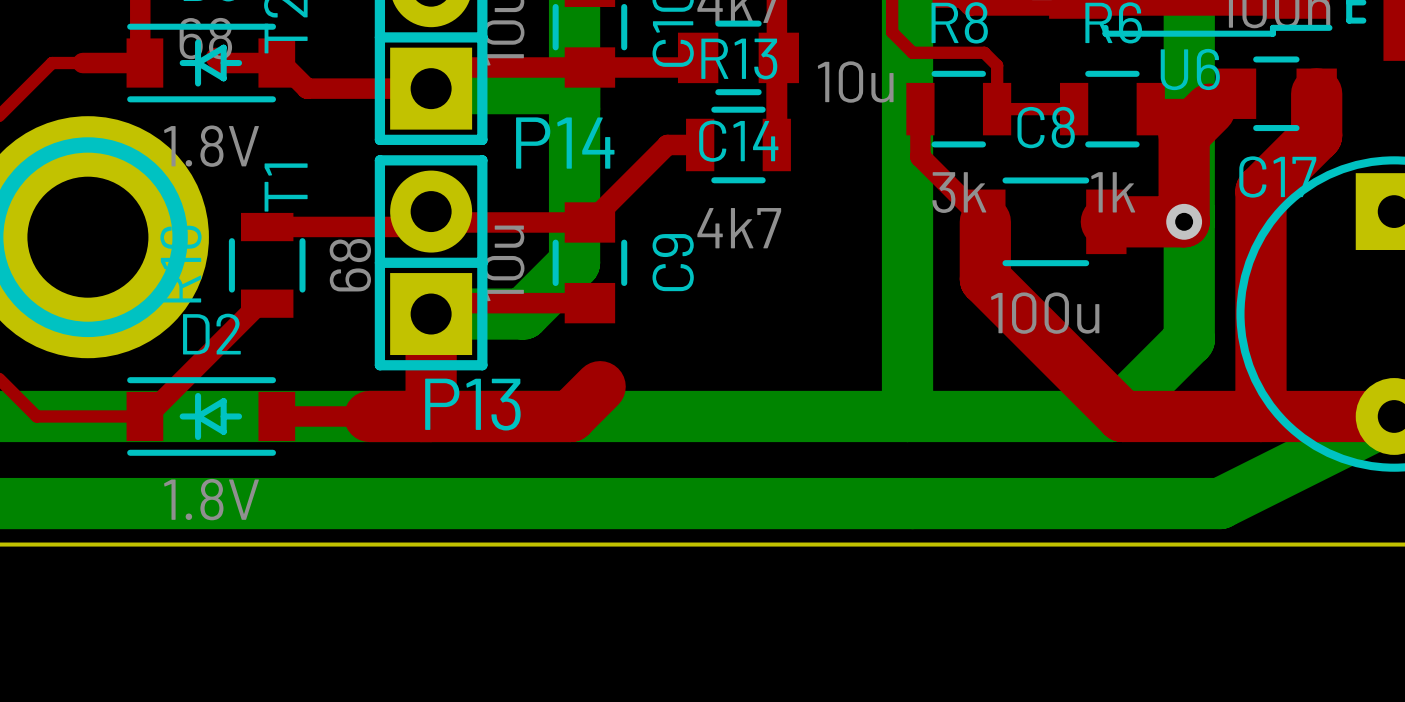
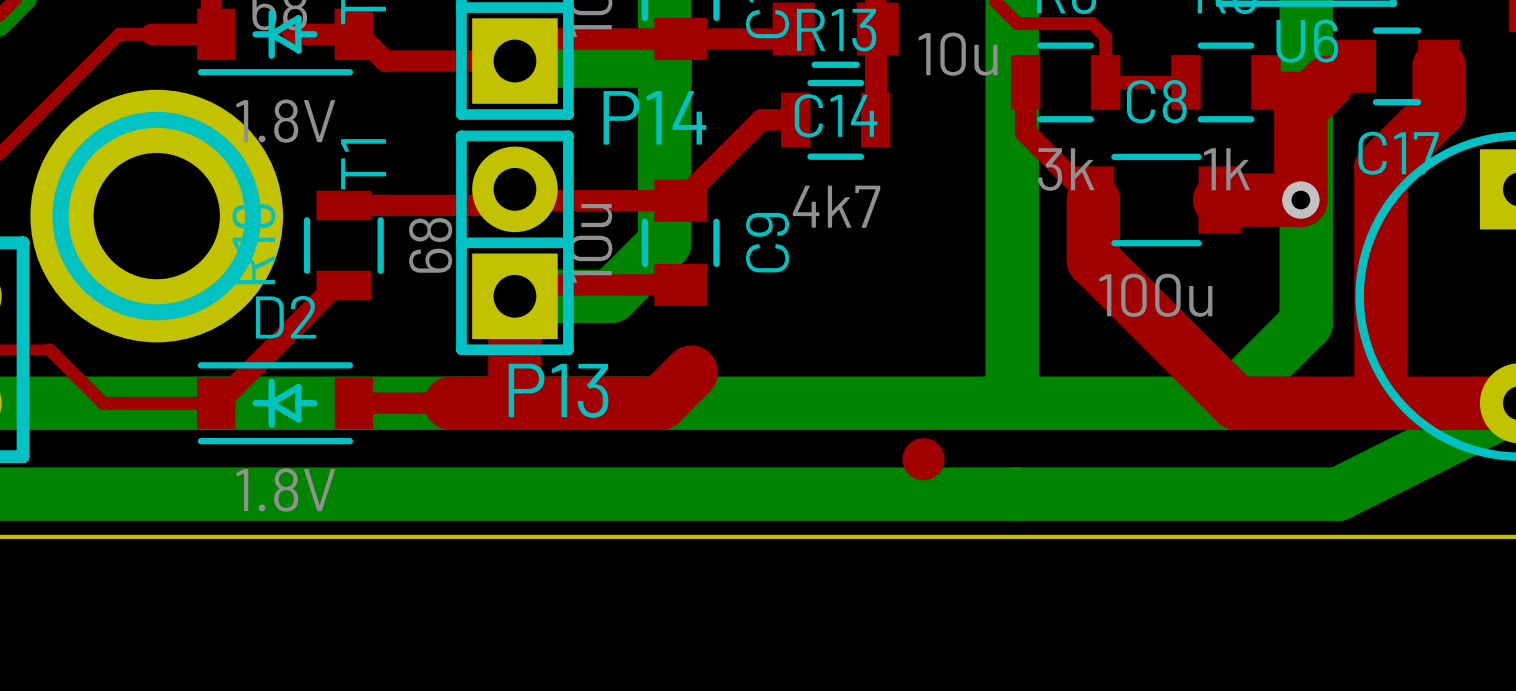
part: none -> (923, 459)

